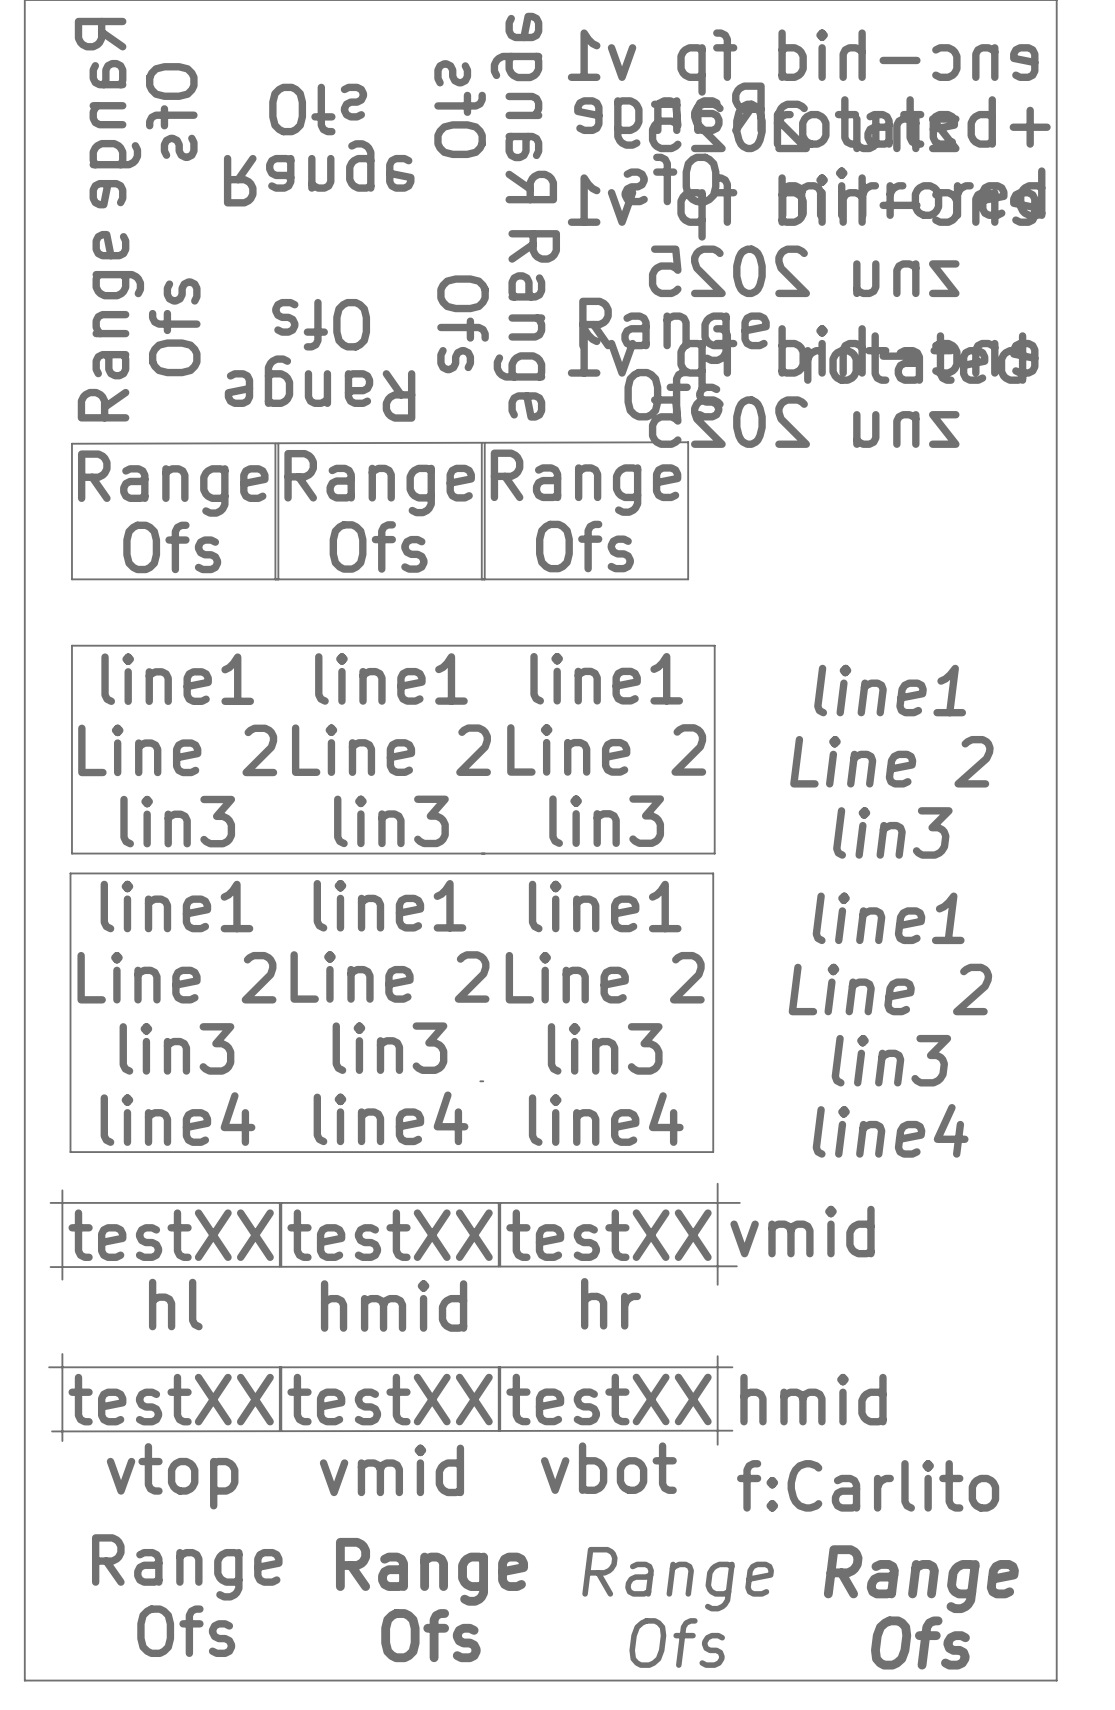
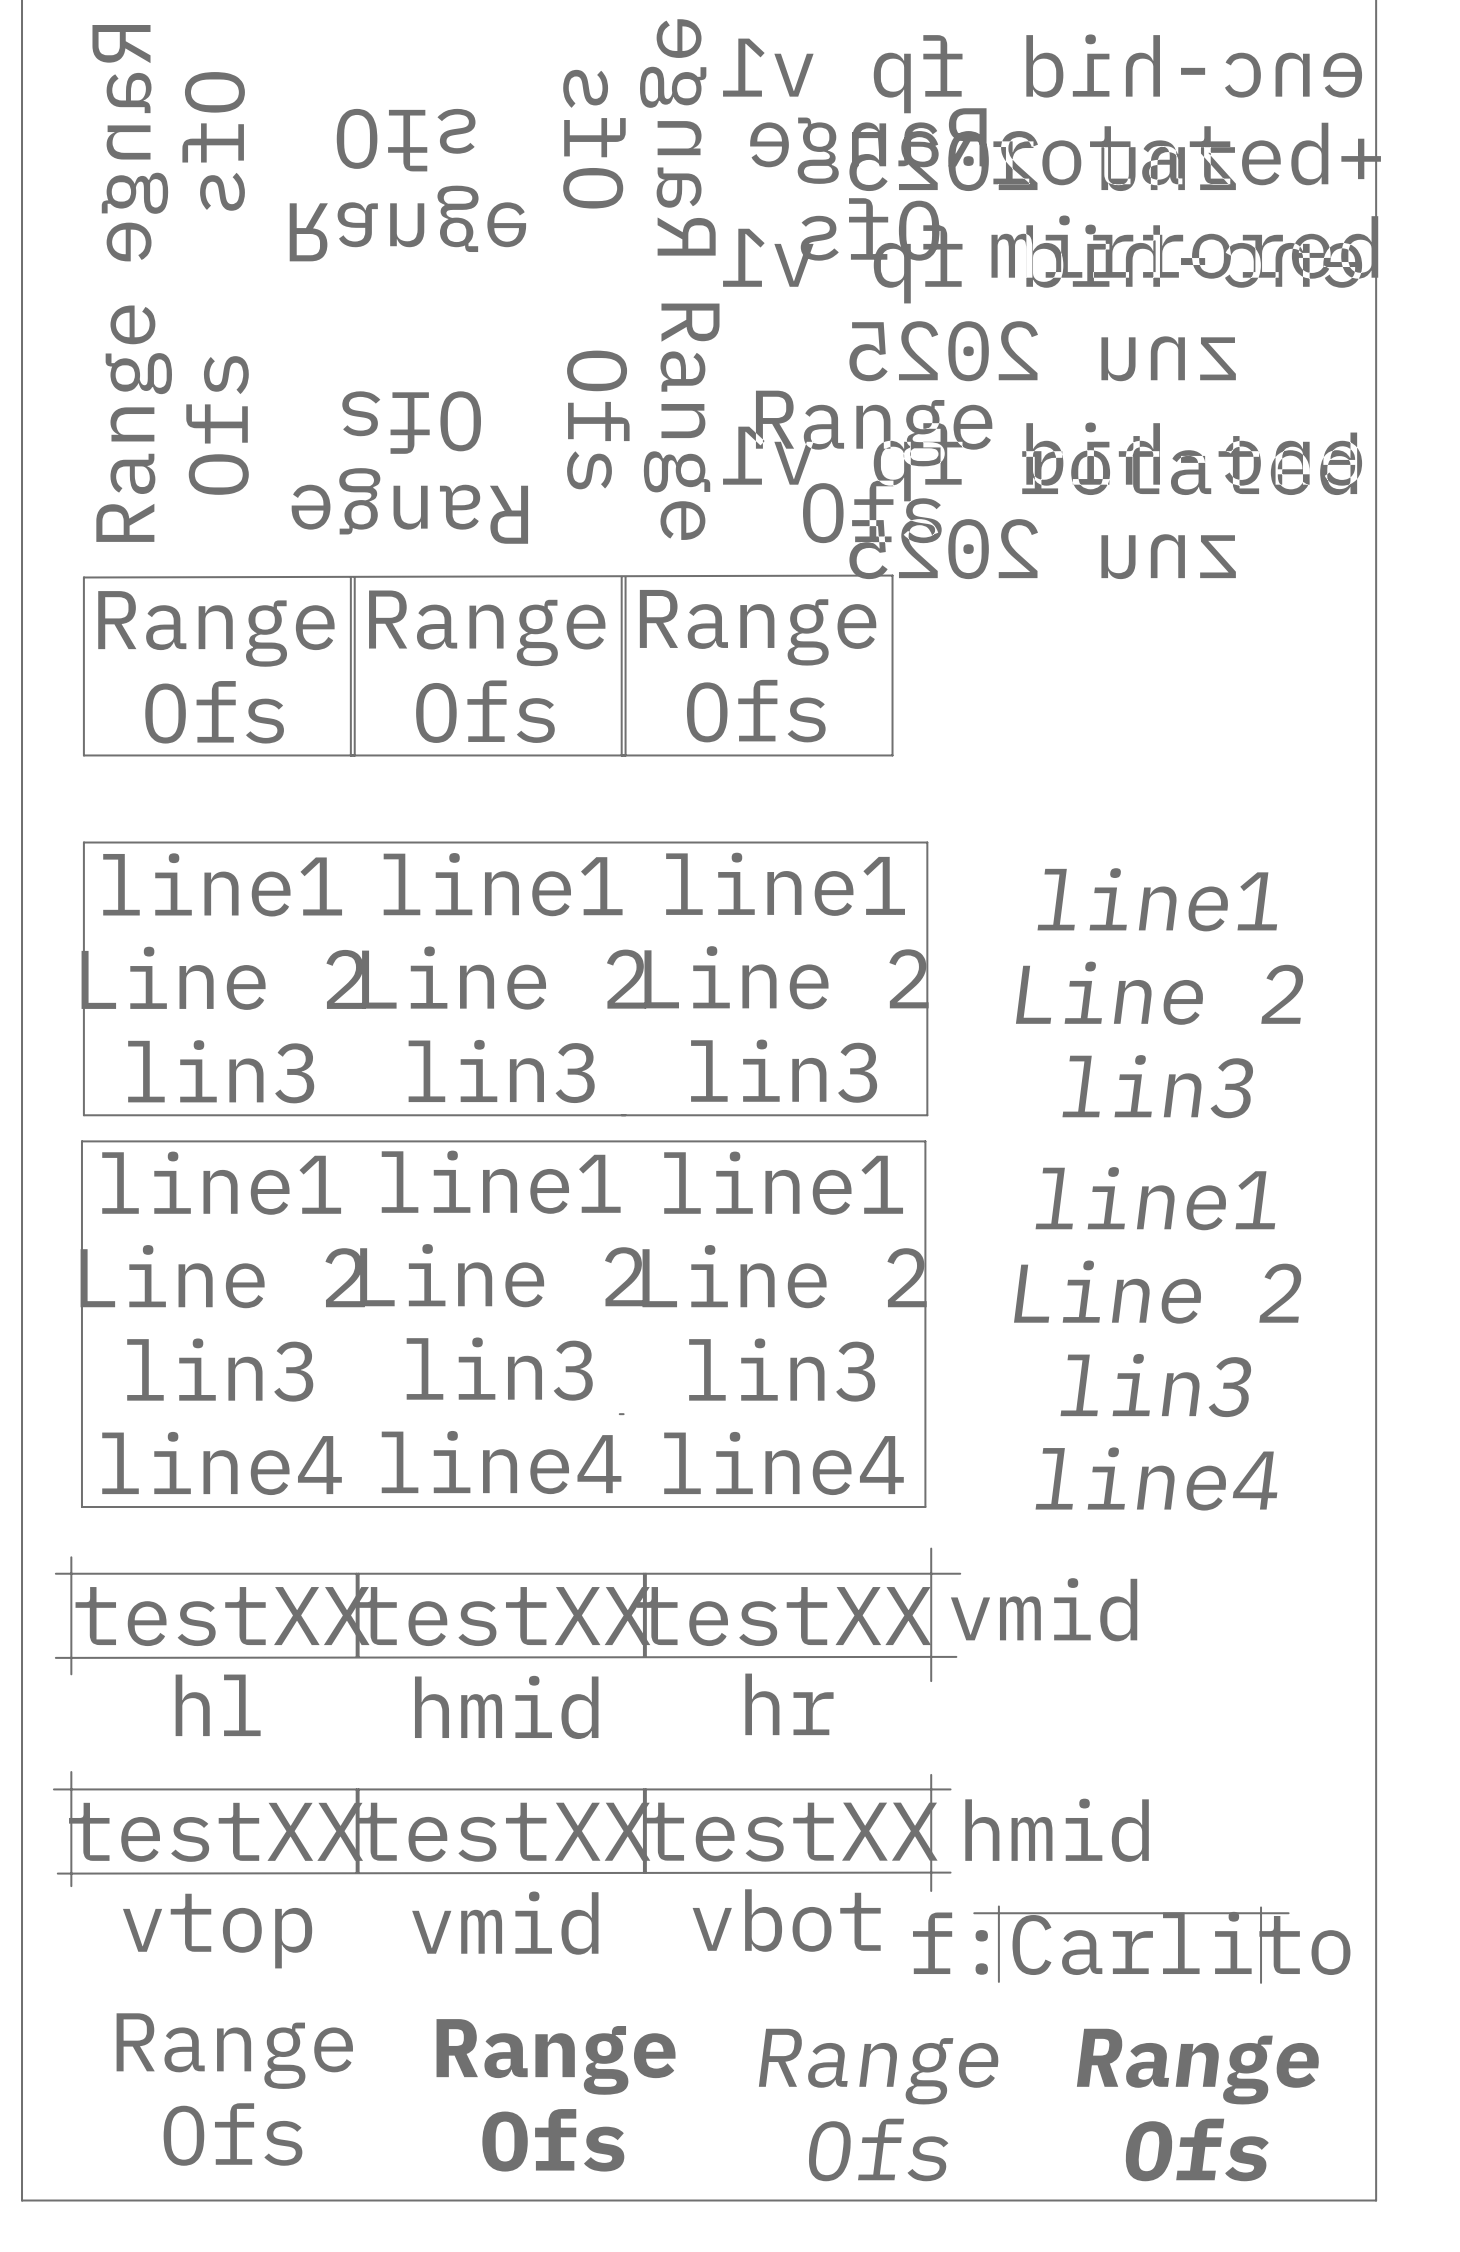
line: none -> (998, 1906) (998, 1981)
line: none -> (1261, 1907) (1261, 1982)
line: none -> (974, 1913) (1288, 1913)

